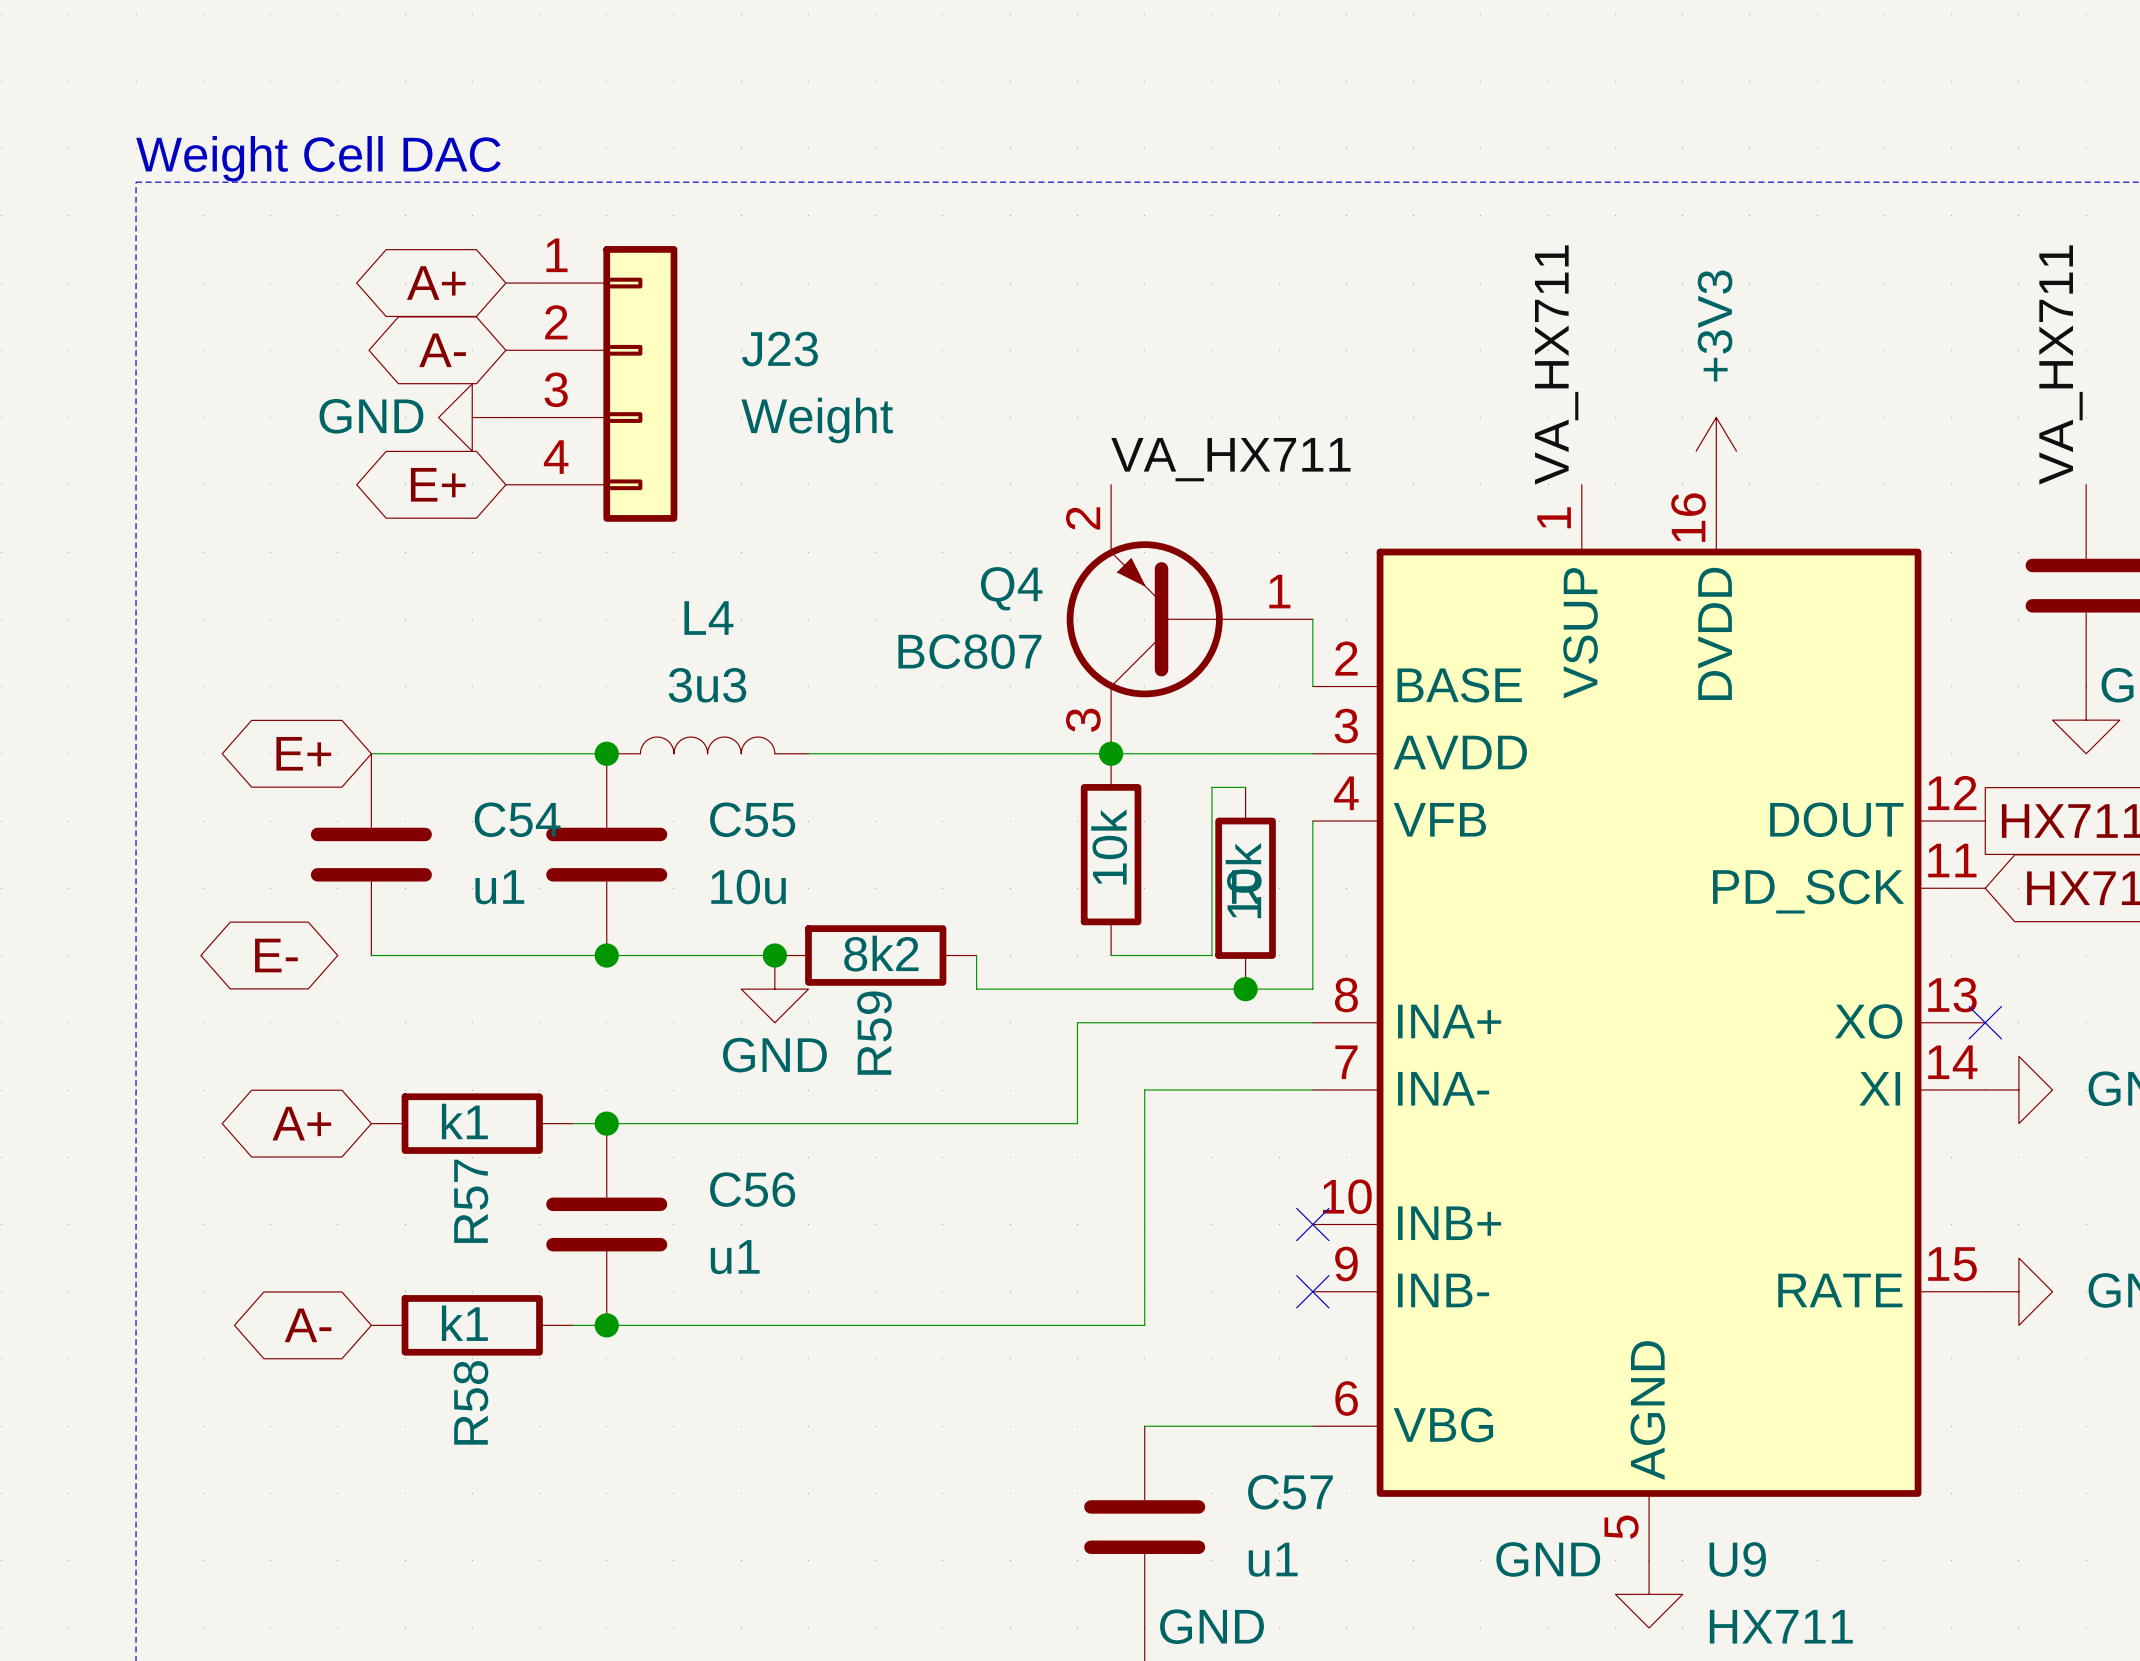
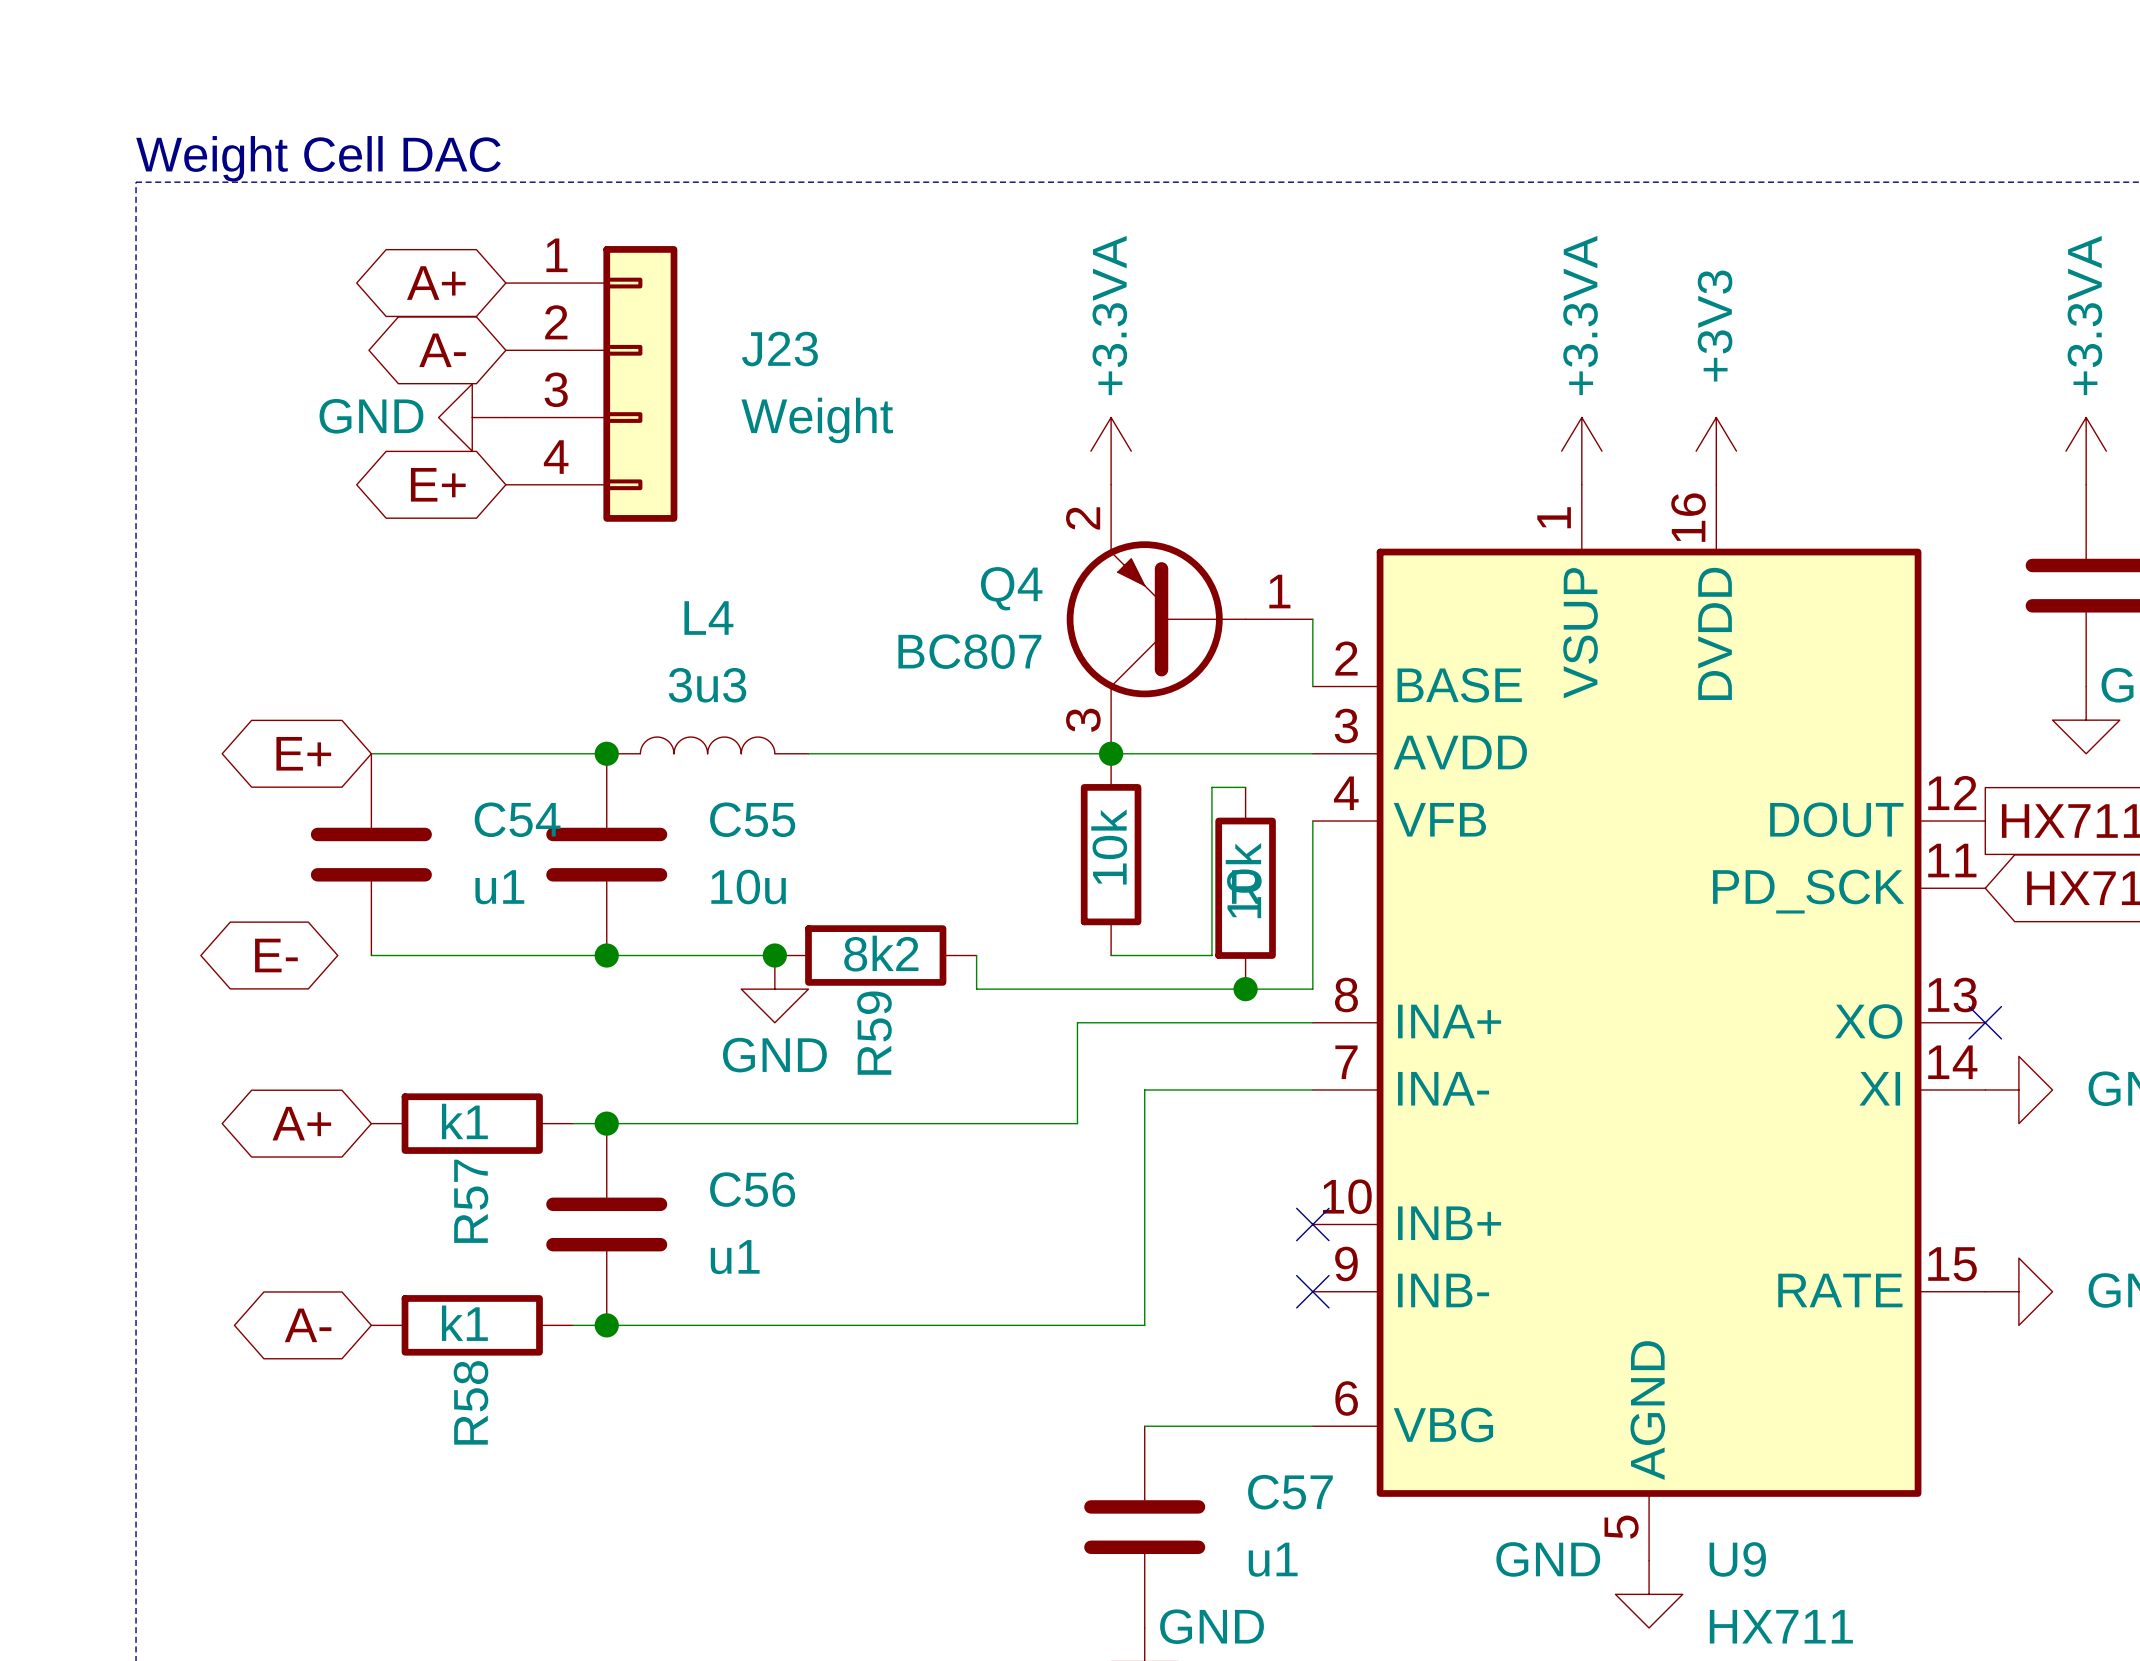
label: VA_HX711 (1556, 364) -> none
label: VA_HX711 (2061, 364) -> none
power symbol: none -> +3.3VA (1111, 451)
power symbol: none -> +3.3VA (1581, 451)
power symbol: none -> +3.3VA (2086, 451)
label: VA_HX711 (1230, 459) -> none

